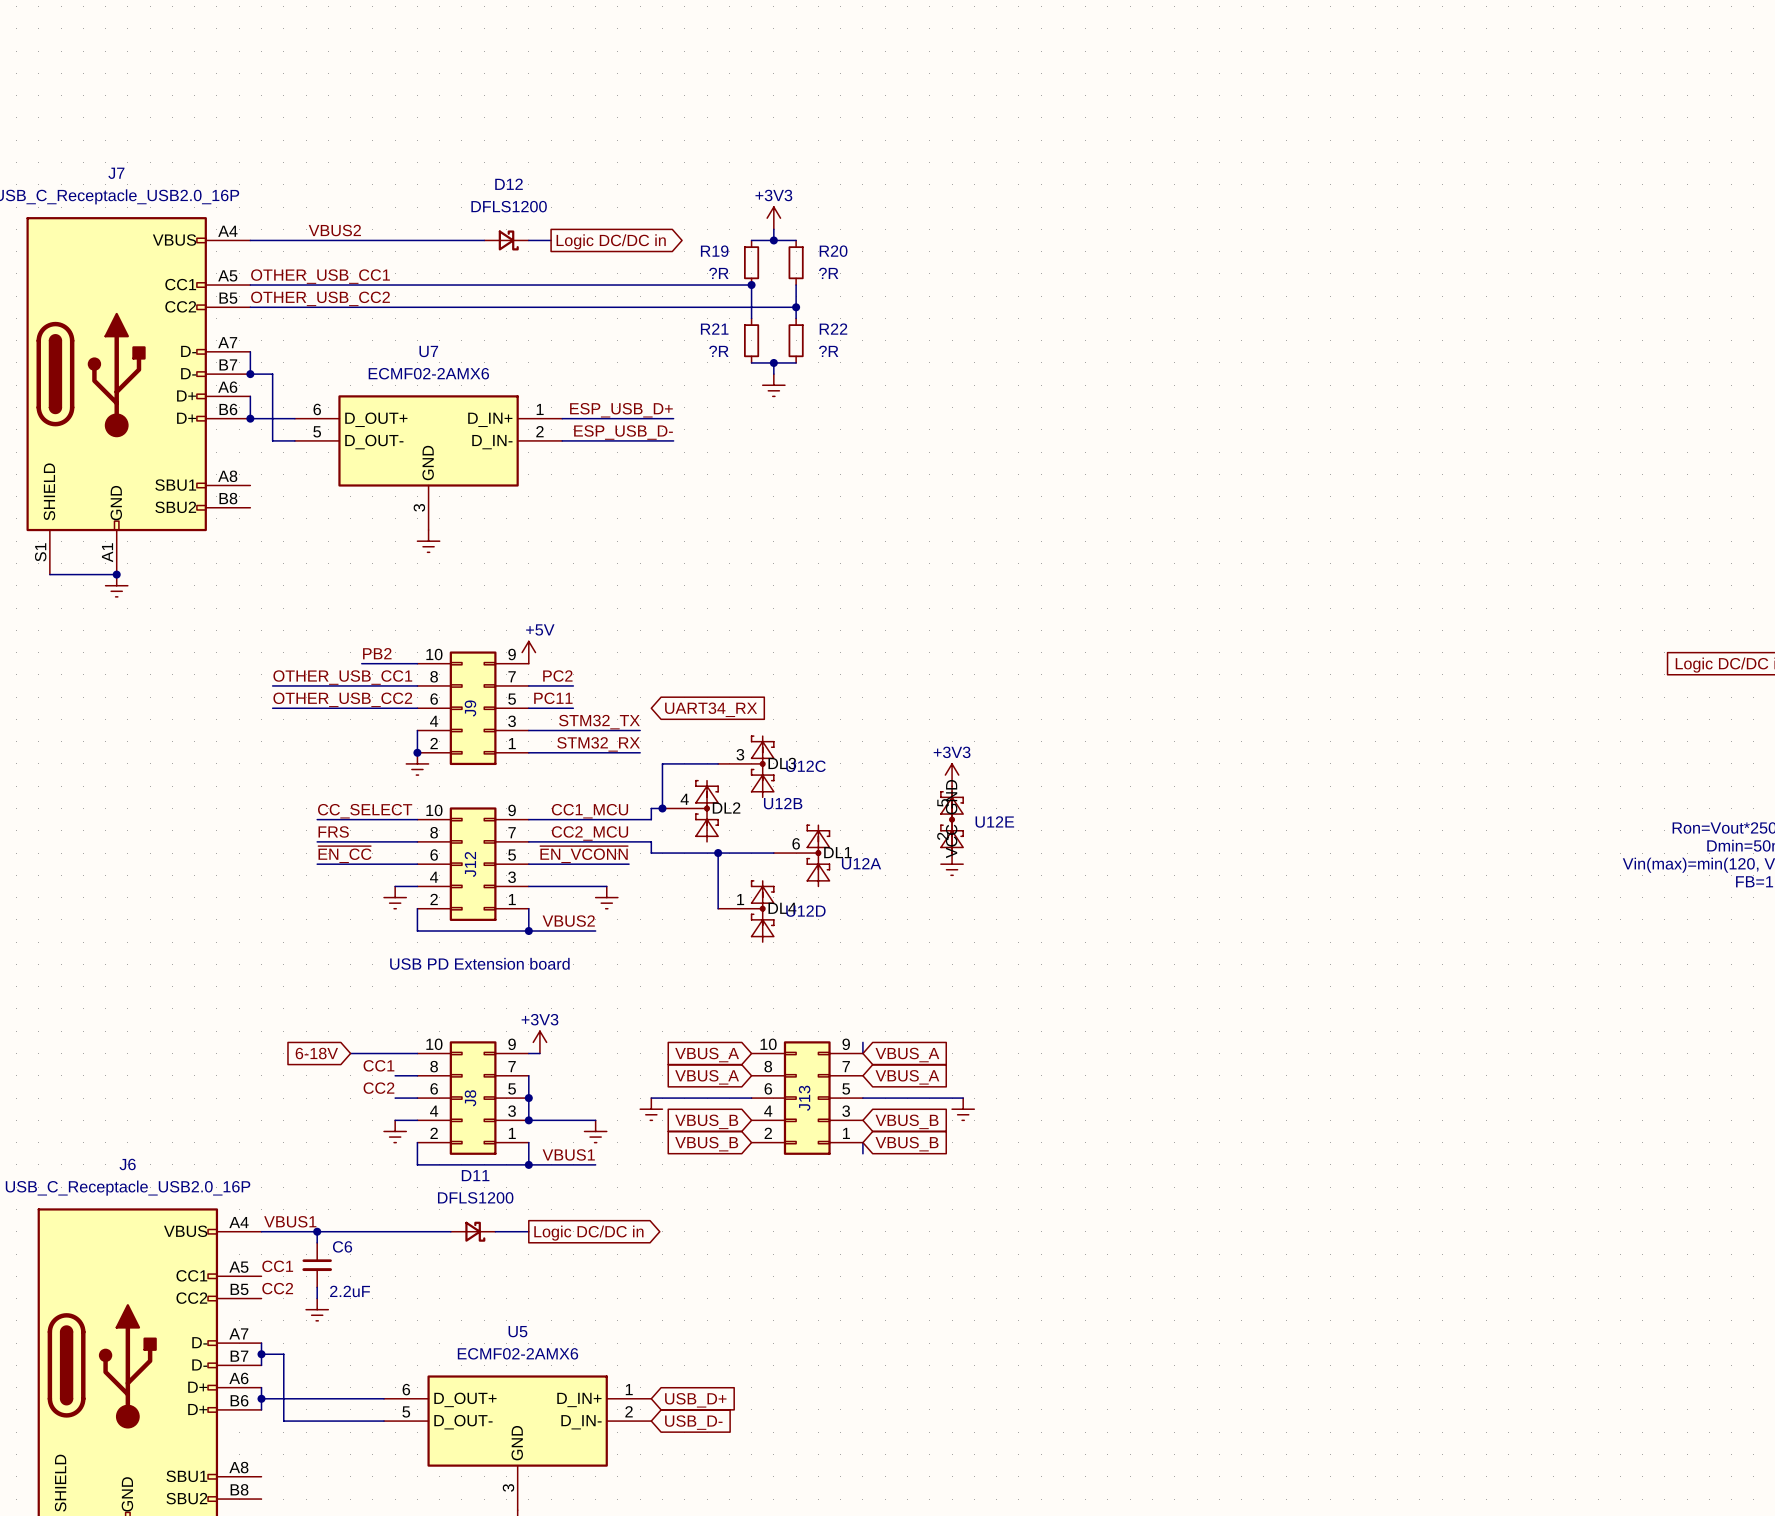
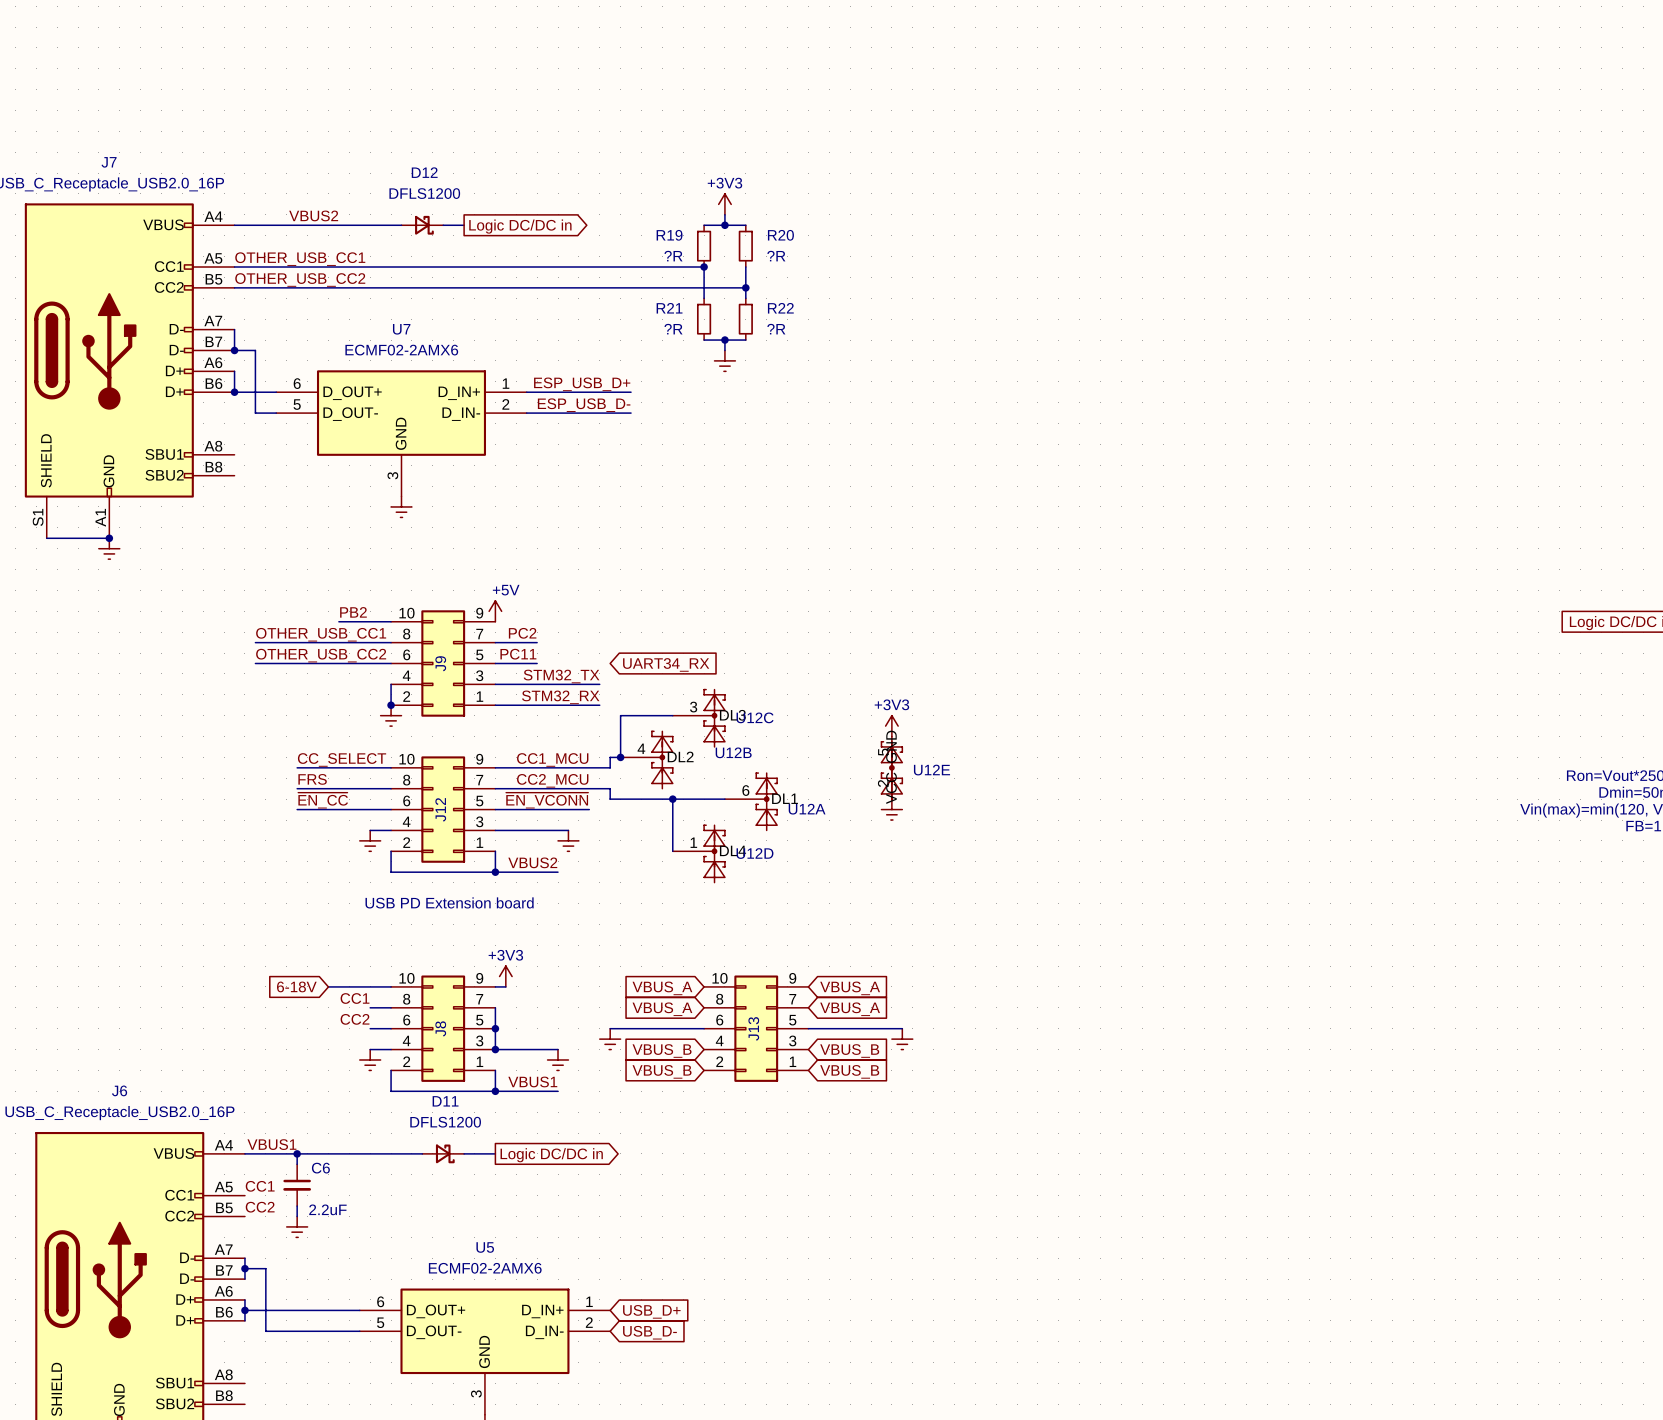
D12 position: (506, 240) -> (422, 225)
wire: (528, 240) (551, 240) -> none
global label position: Logic DC/DC in (611, 241) -> Logic DC/DC in (520, 226)
wire: (862, 1042) (862, 1053) -> none
wire: (862, 1142) (862, 1153) -> none

